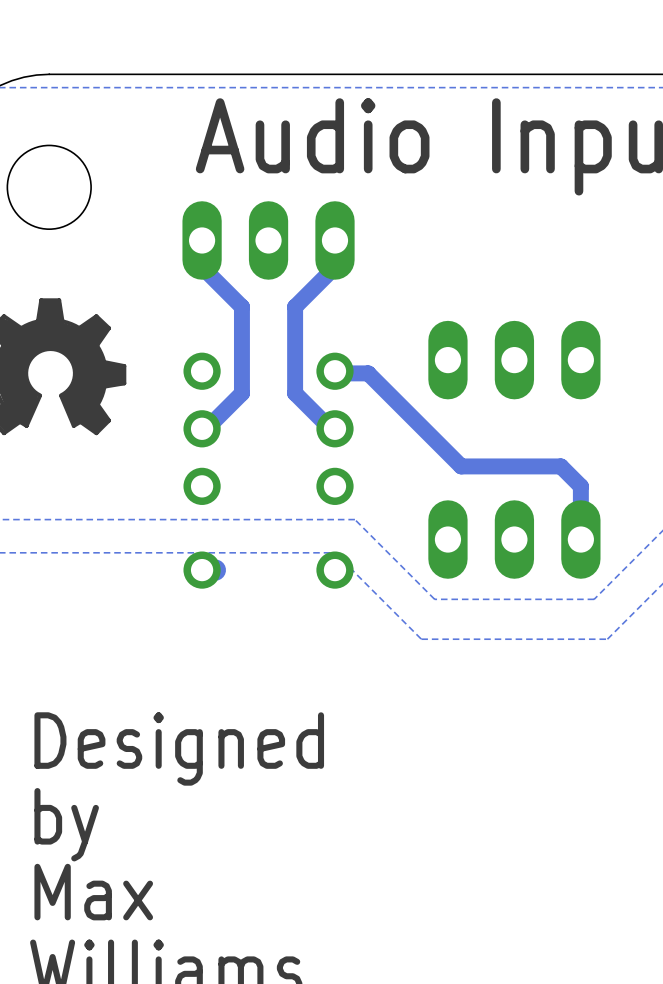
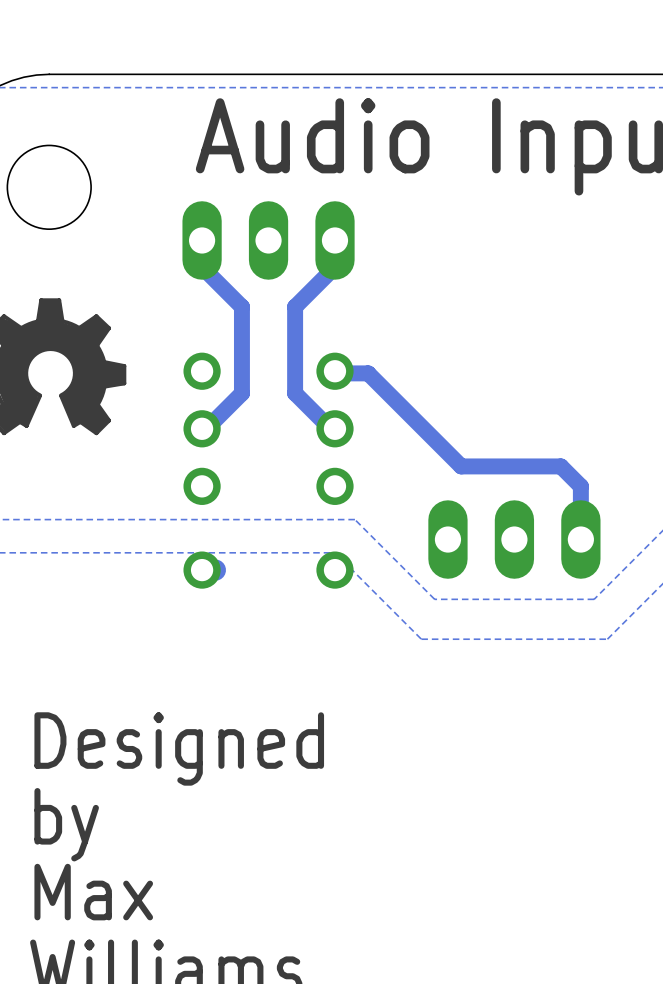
part: (514, 360) -> none

